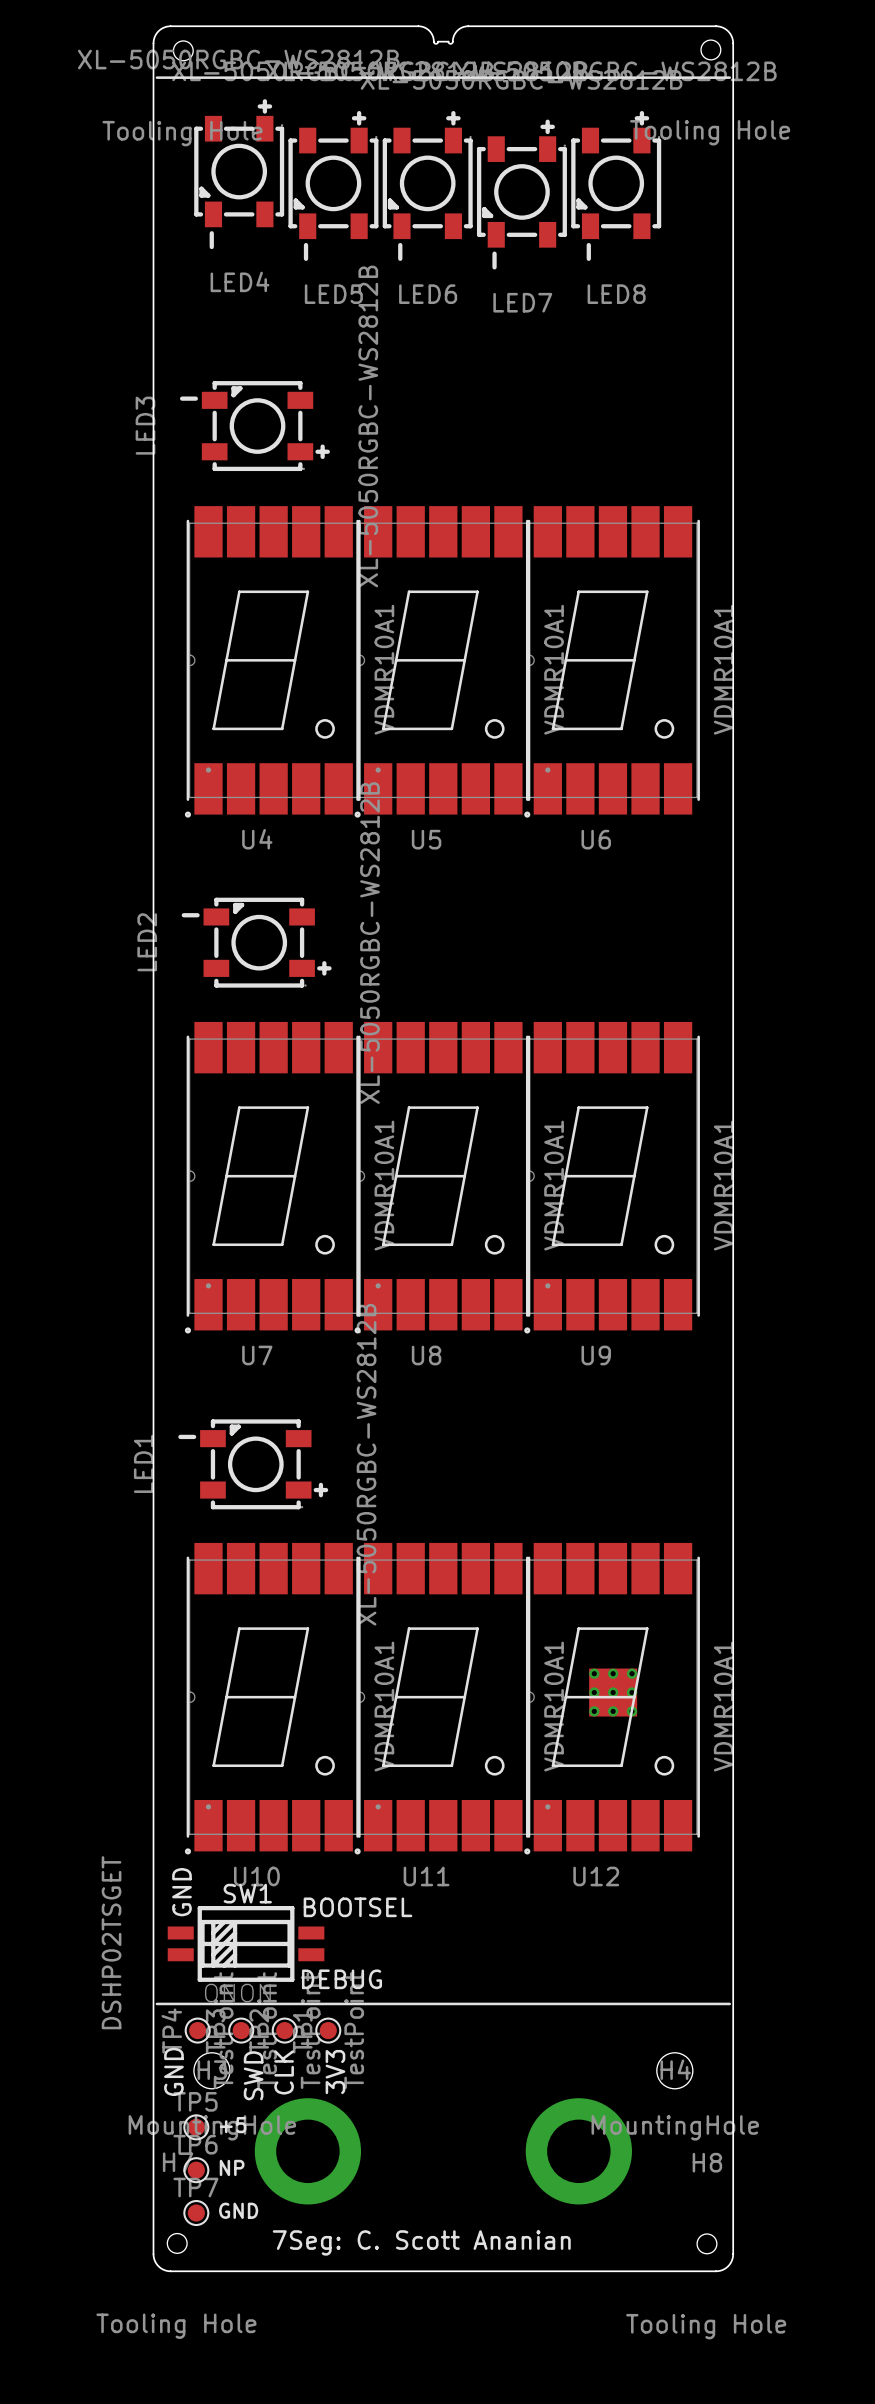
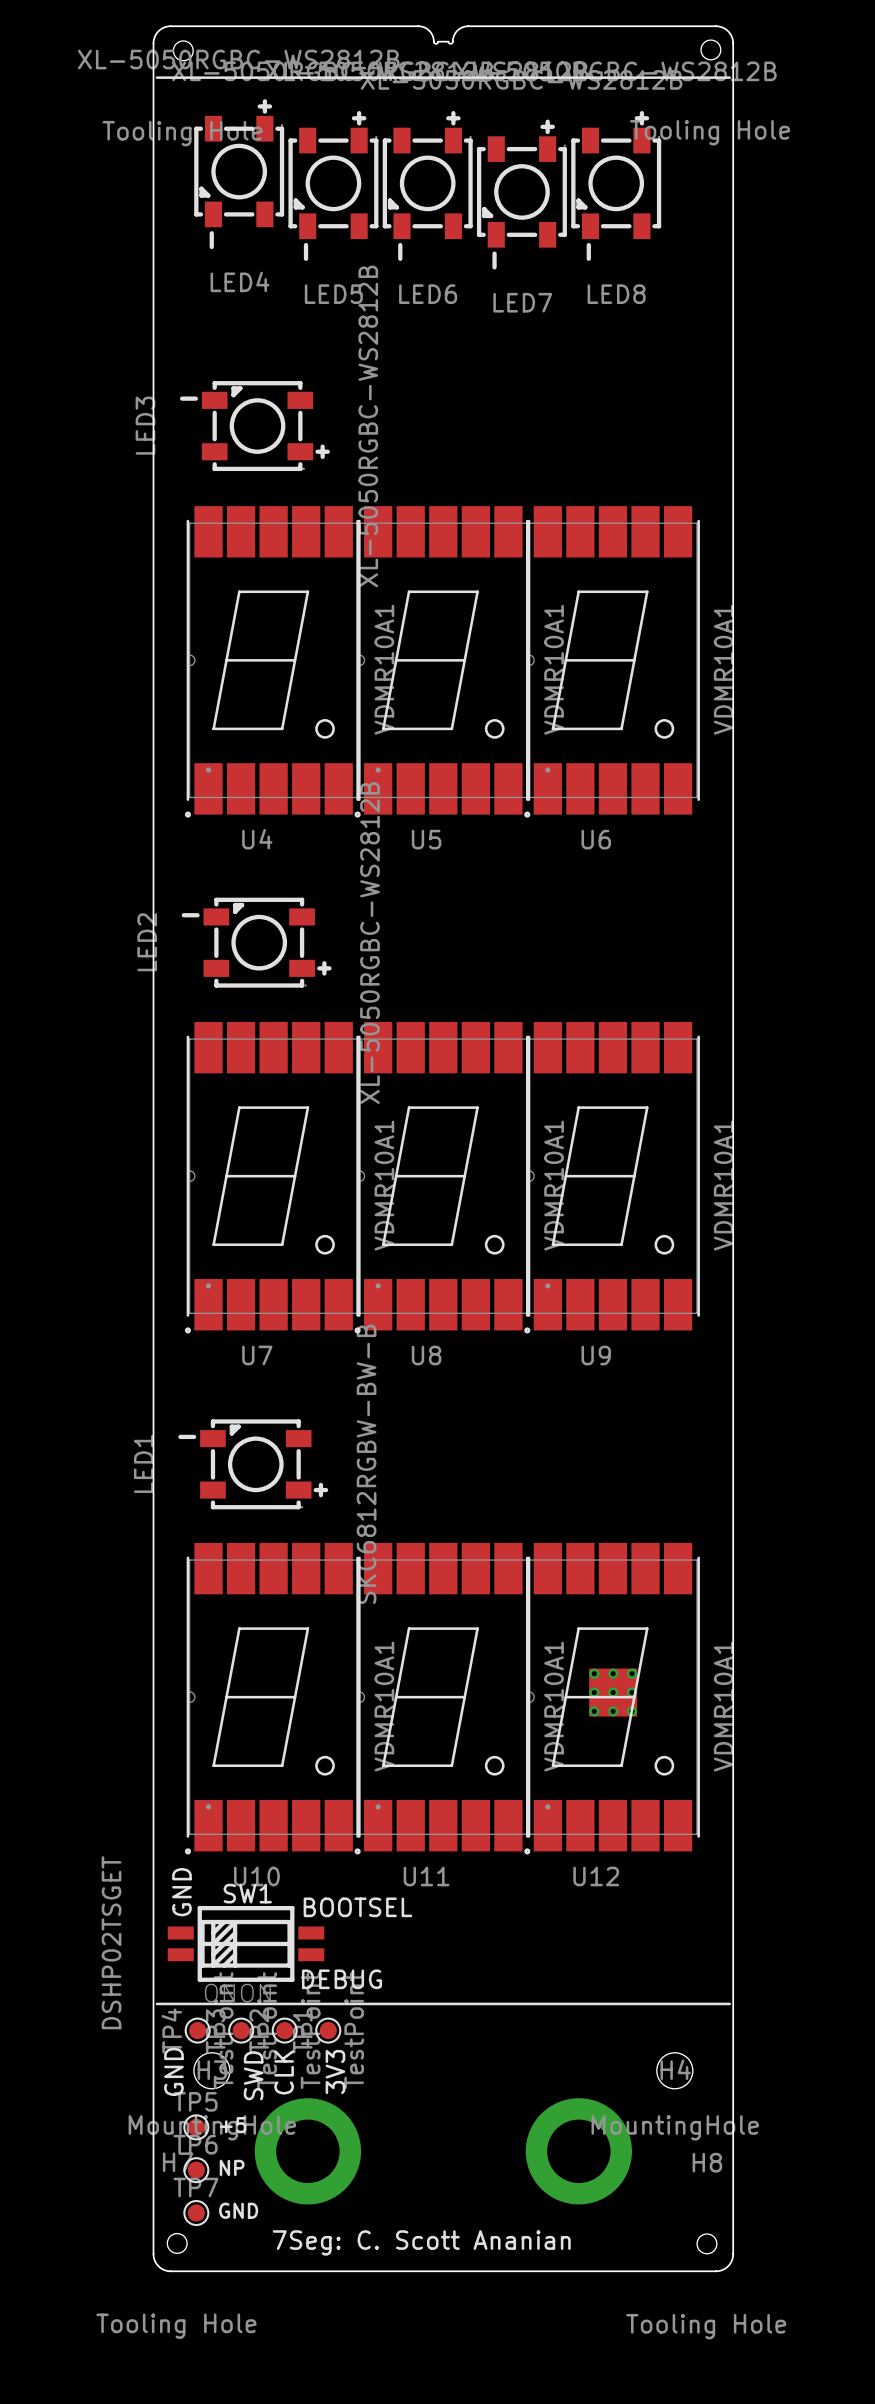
LED1 value: XL-5050RGBC-WS2812B (366, 1464) -> SKC6812RGBW-BW-B (366, 1464)

